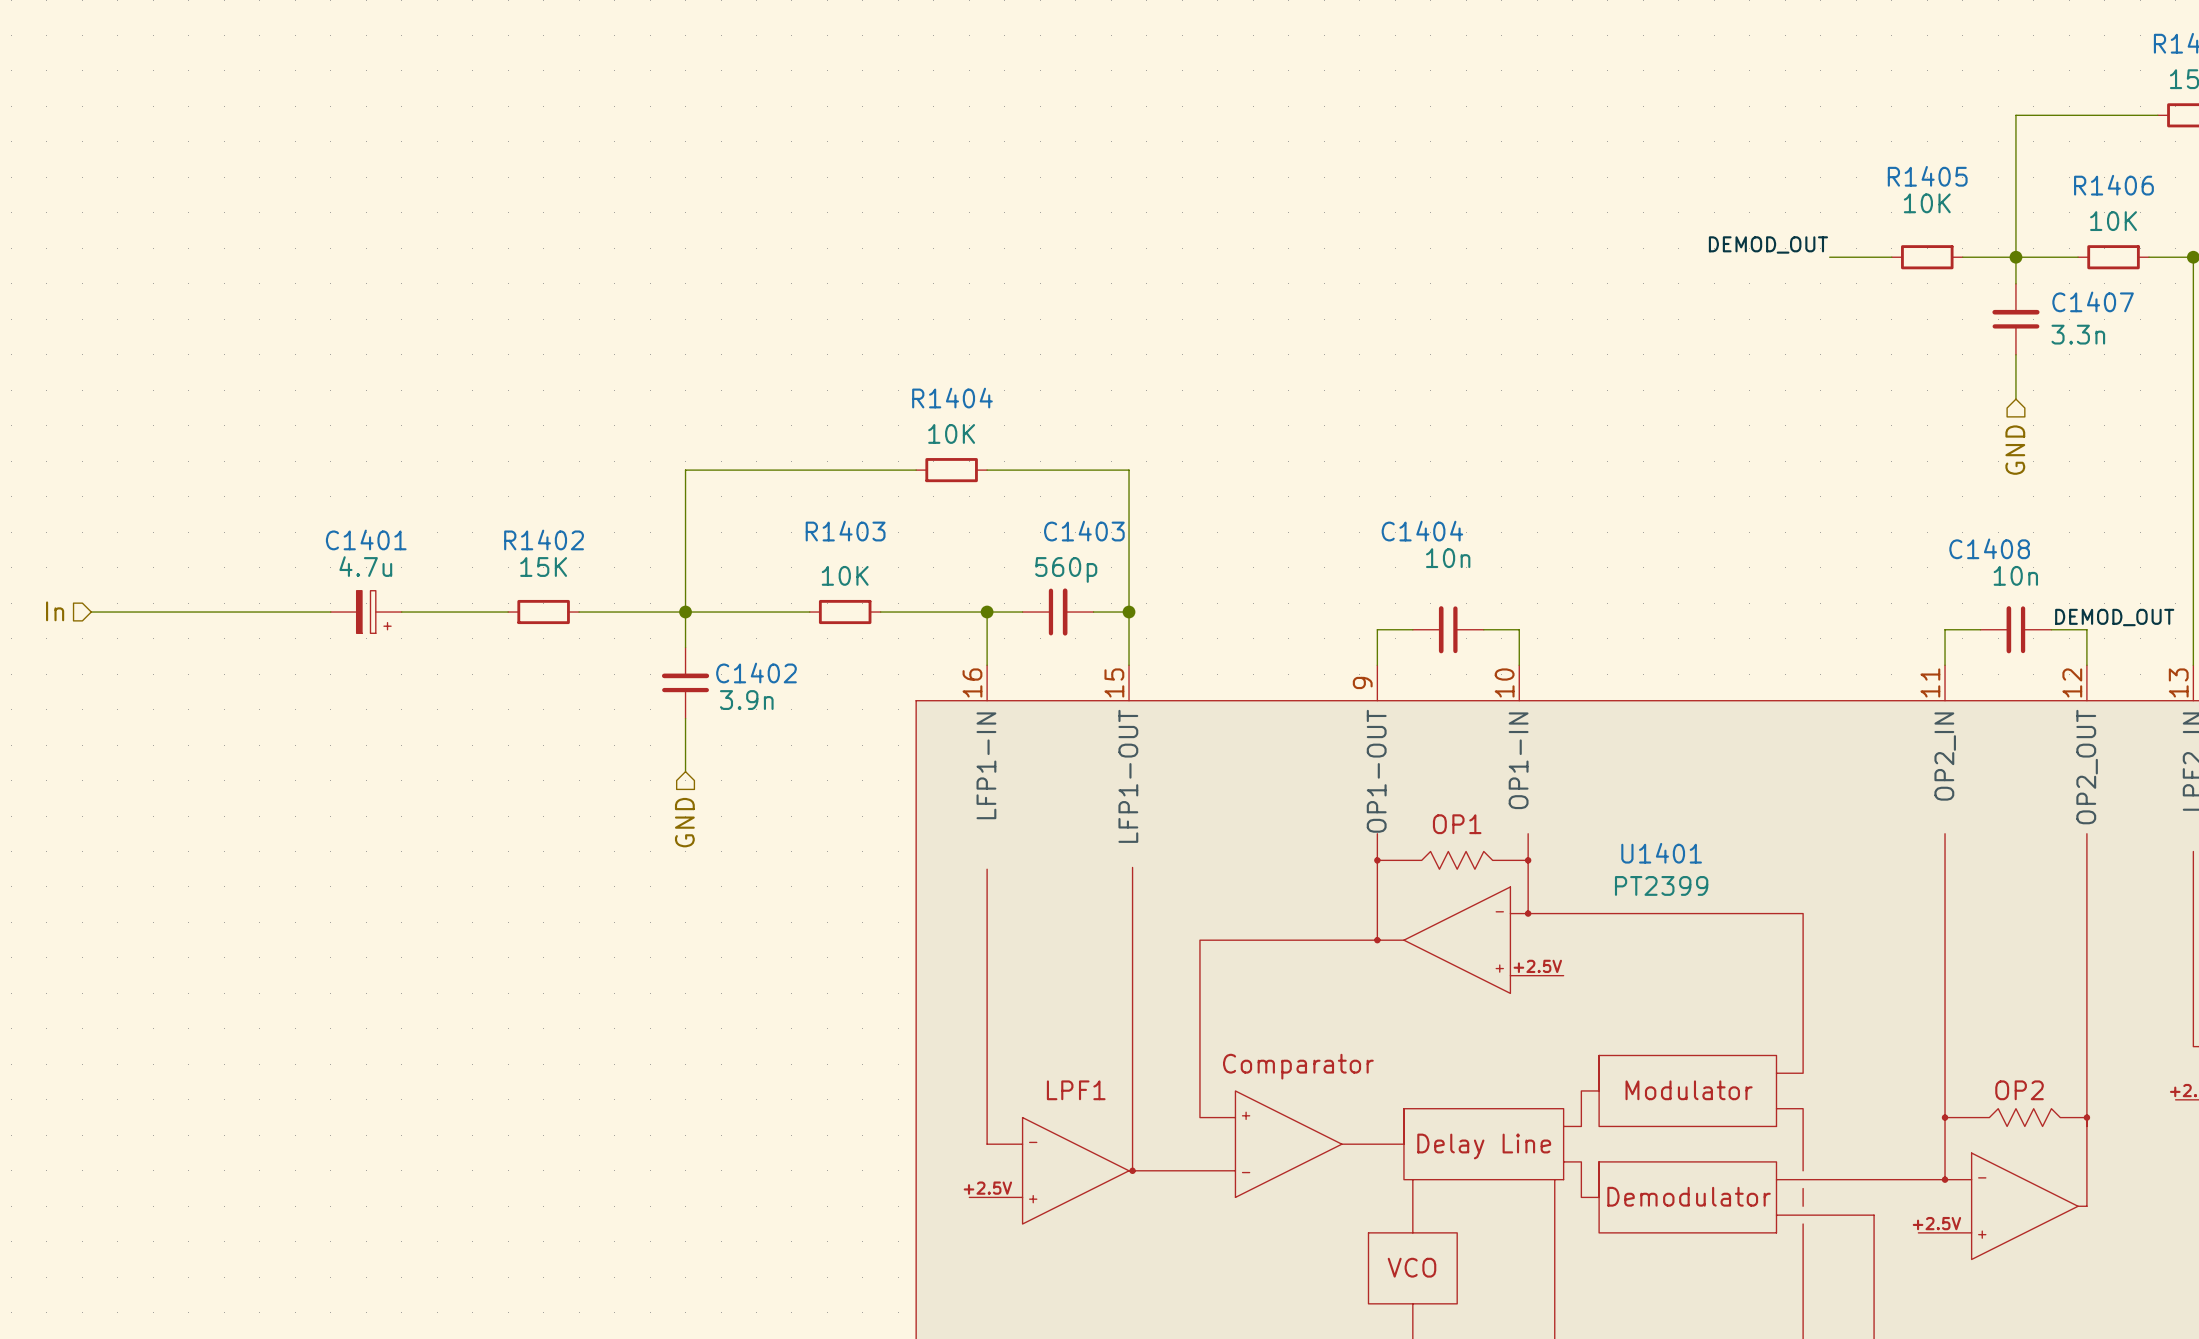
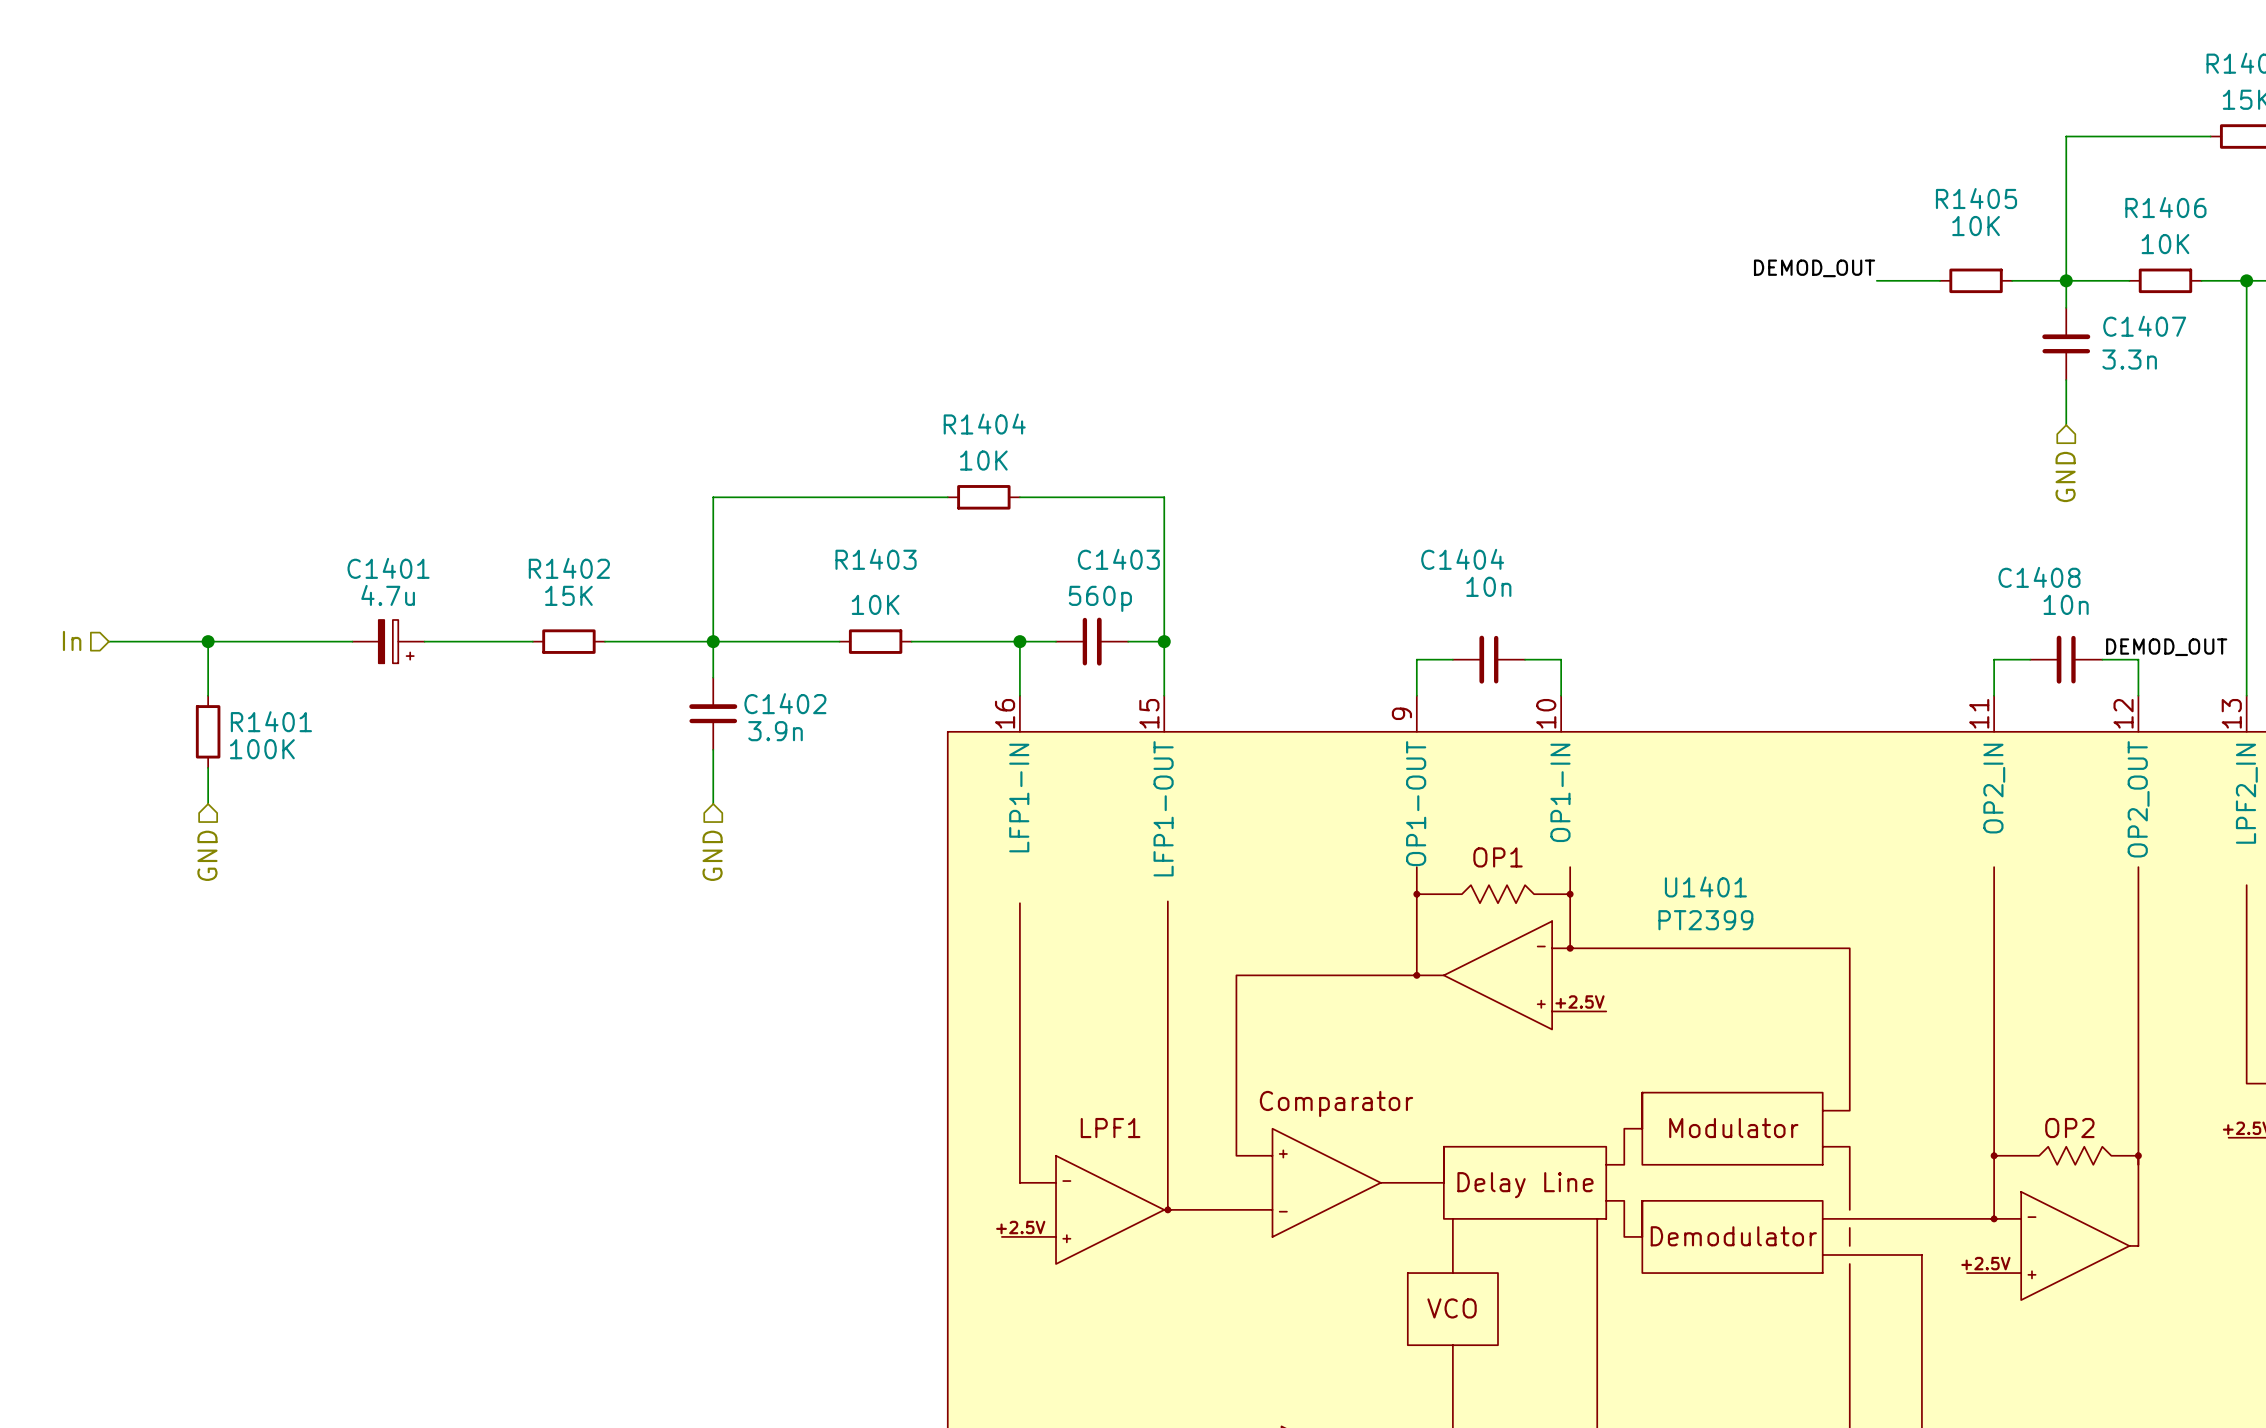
wire: none -> (208, 641) (208, 695)
junction: none -> (208, 641)
R1401: none -> 100K (208, 731)
wire: none -> (208, 767) (208, 803)
hierarchical label: none -> GND (207, 855)

